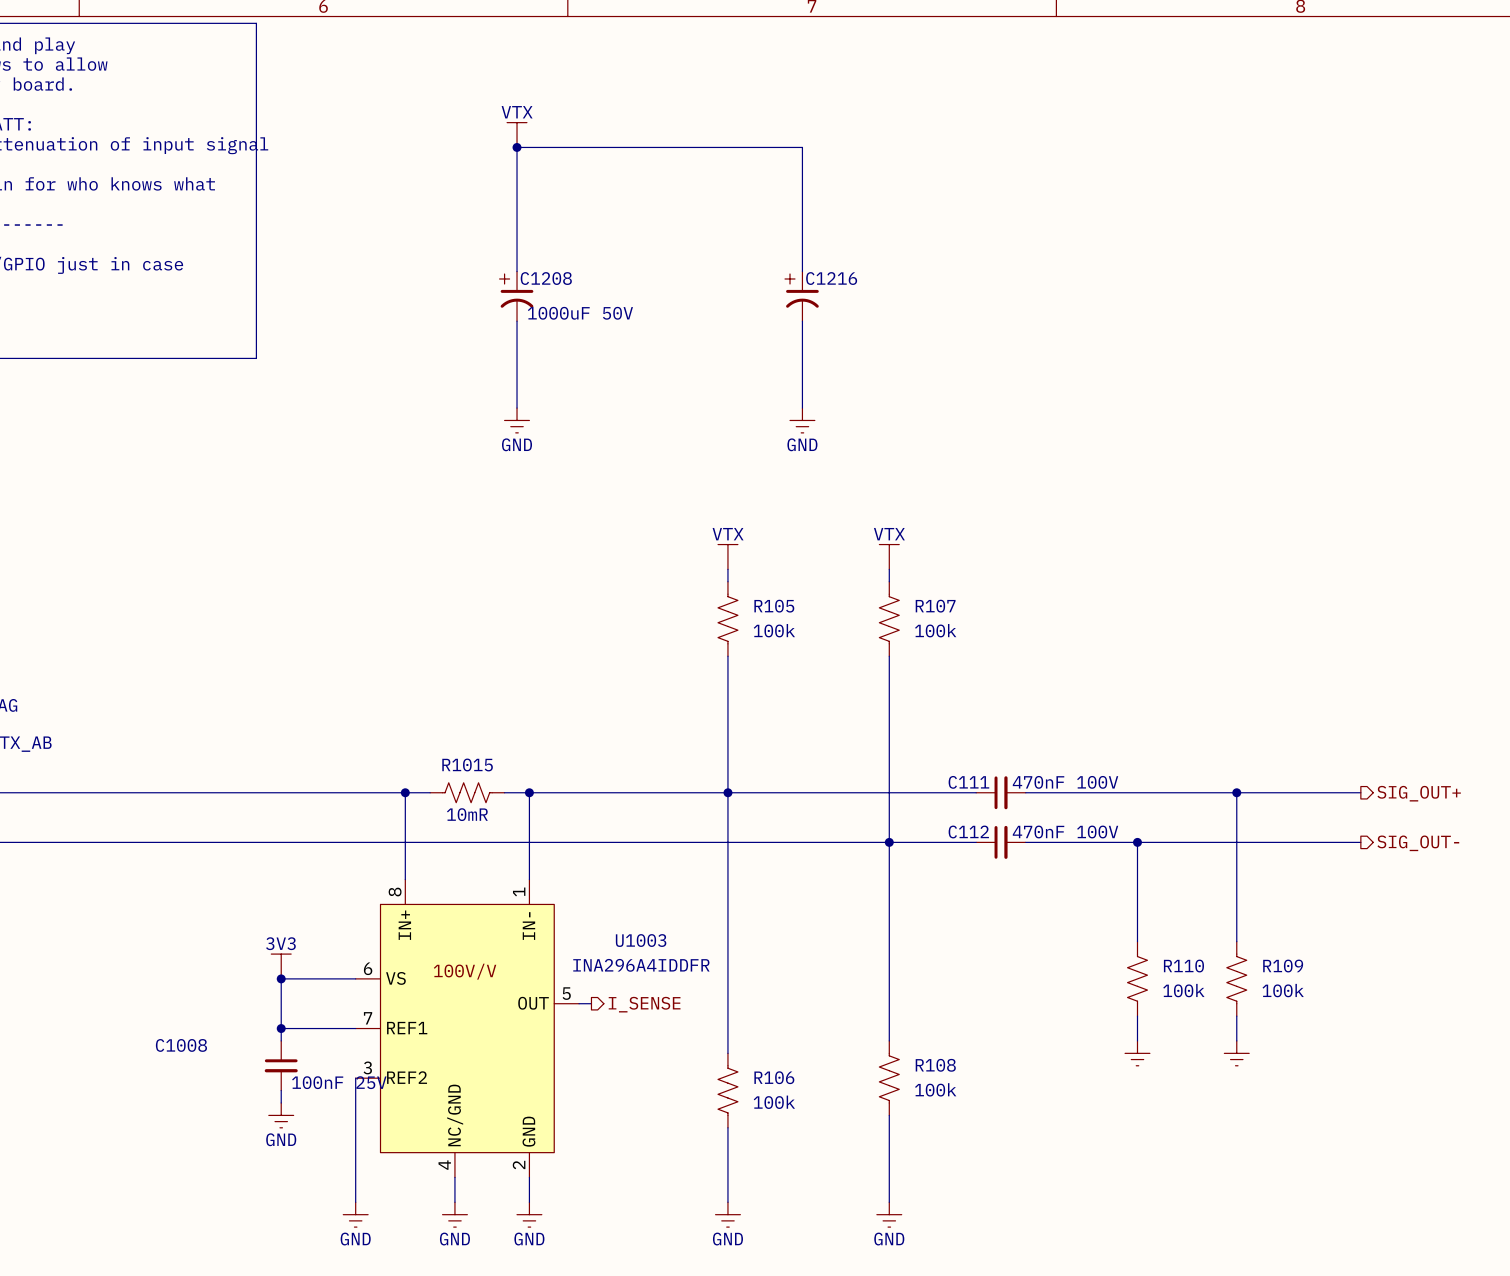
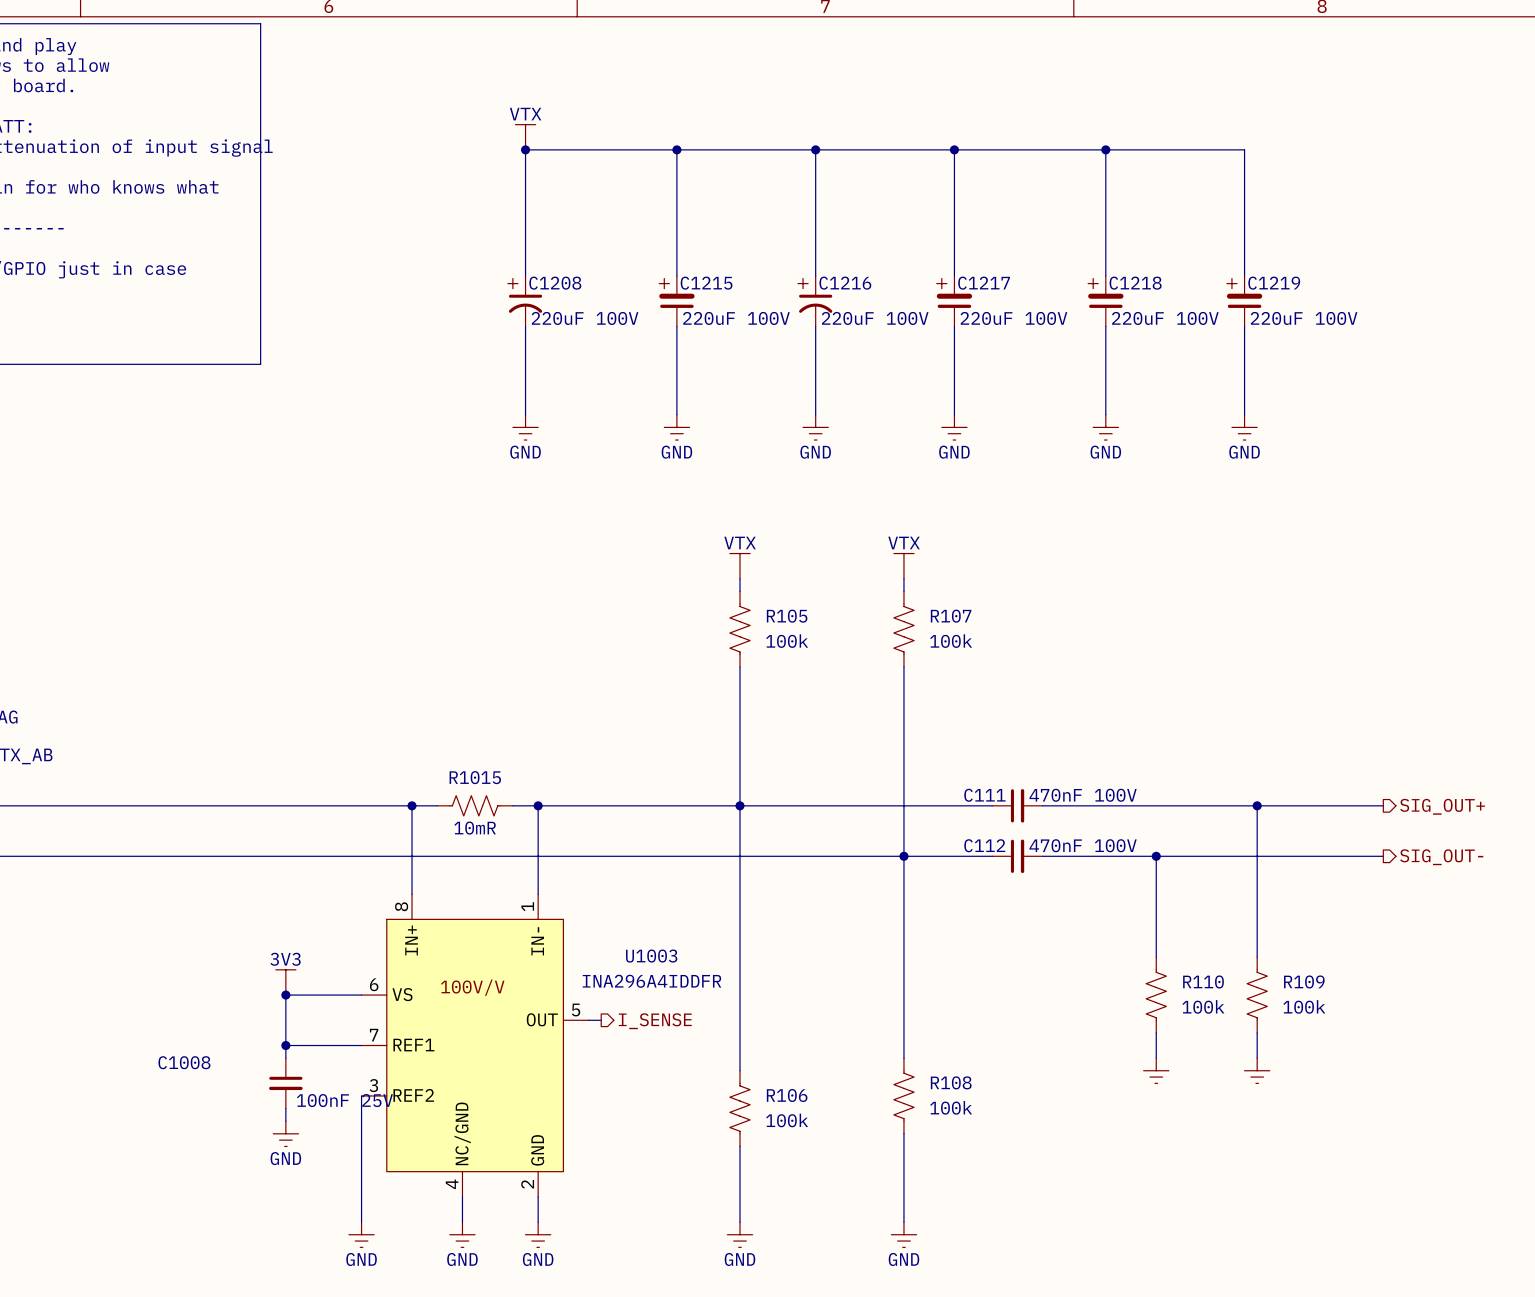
wire: none -> (676, 149) (676, 276)
junction: none -> (676, 149)
wire: none -> (815, 149) (1244, 149) (1244, 276)
junction: none -> (815, 149)
wire: none -> (954, 149) (954, 276)
junction: none -> (954, 149)
wire: none -> (1105, 149) (1105, 276)
junction: none -> (1105, 149)
C1215: none -> 220uF 100V (676, 301)
C1217: none -> 220uF 100V (954, 301)
C1218: none -> 220uF 100V (1105, 301)
C1219: none -> 220uF 100V (1244, 301)
C1208 value: 1000uF 50V (580, 313) -> 220uF 100V (585, 318)
C1216 value: none -> 220uF 100V (875, 318)
wire: none -> (676, 326) (676, 414)
wire: none -> (954, 326) (954, 414)
wire: none -> (1105, 326) (1105, 414)
wire: none -> (1244, 326) (1244, 414)
power symbol: none -> GND (676, 427)
power symbol: none -> GND (954, 427)
power symbol: none -> GND (1105, 427)
power symbol: none -> GND (1244, 427)

